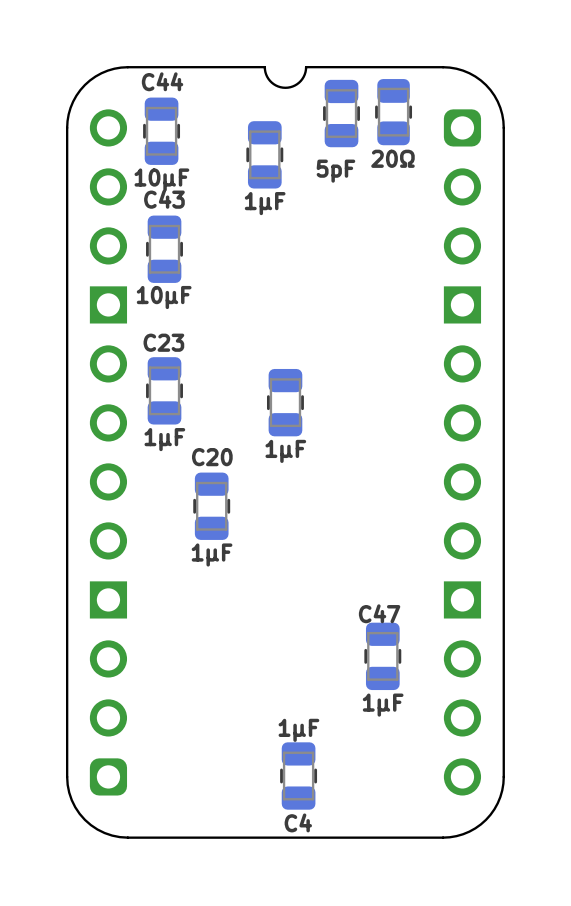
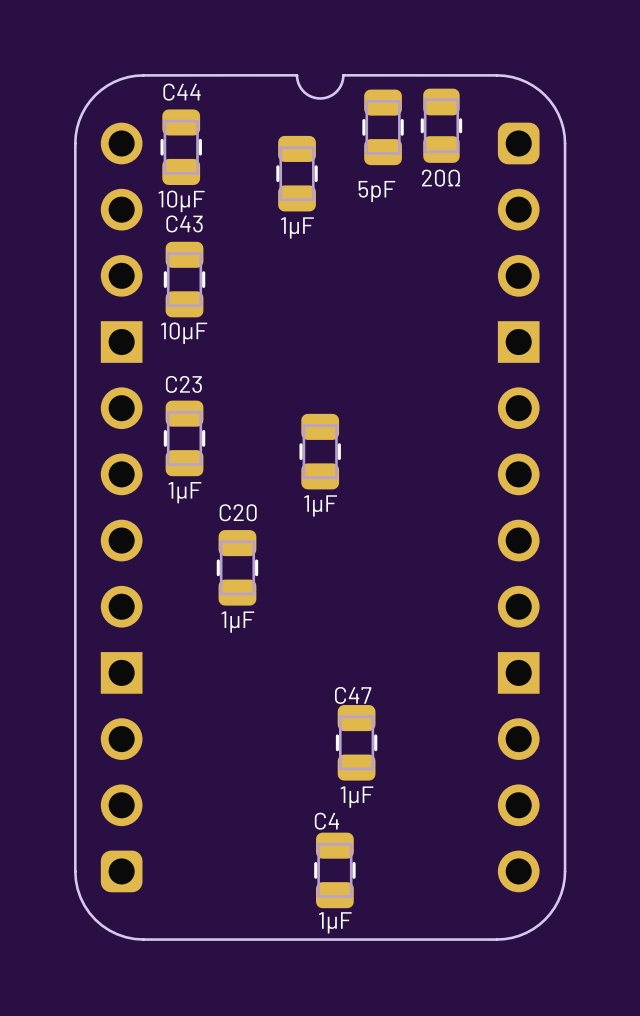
C47 position: (382, 656) -> (356, 742)
C4 value position: 1μF (298, 730) -> 1μF (335, 922)
C4 name position: C4 (298, 822) -> C4 (326, 821)

